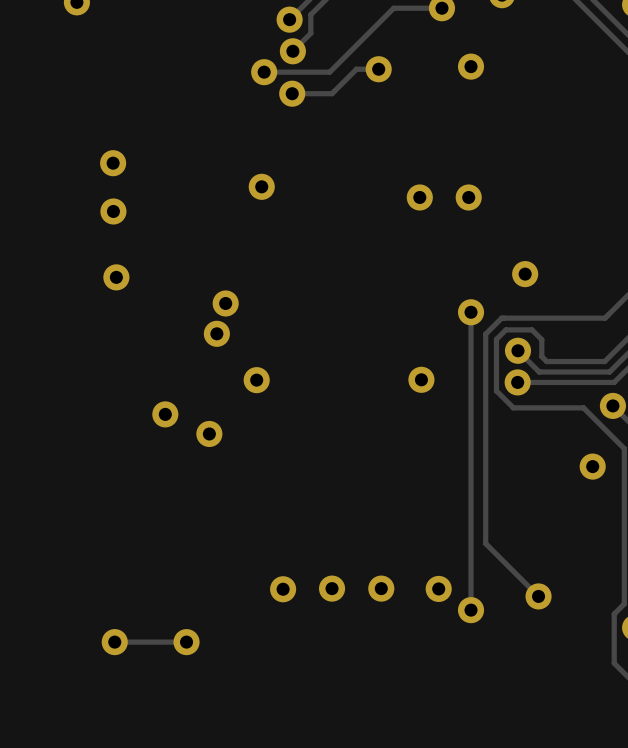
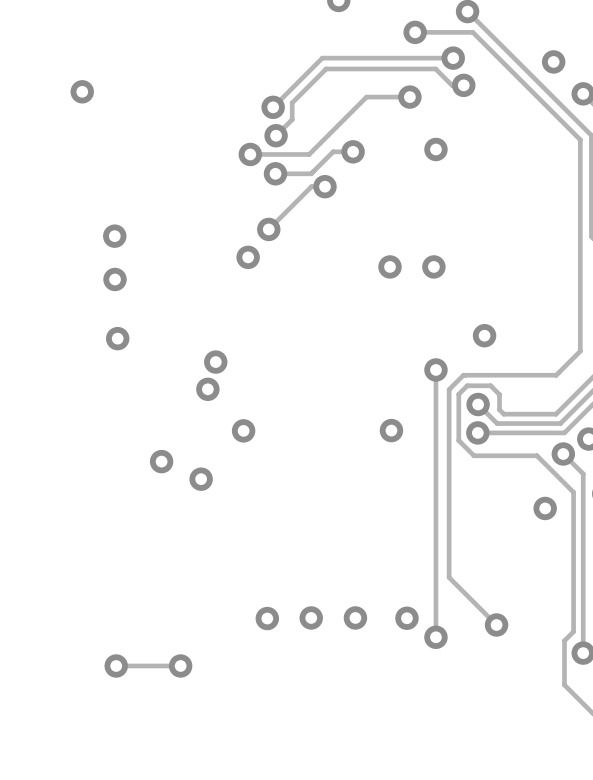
track: none -> (324, 186) (311, 186) (268, 229)
via: none -> (324, 186)
via: none -> (268, 229)

